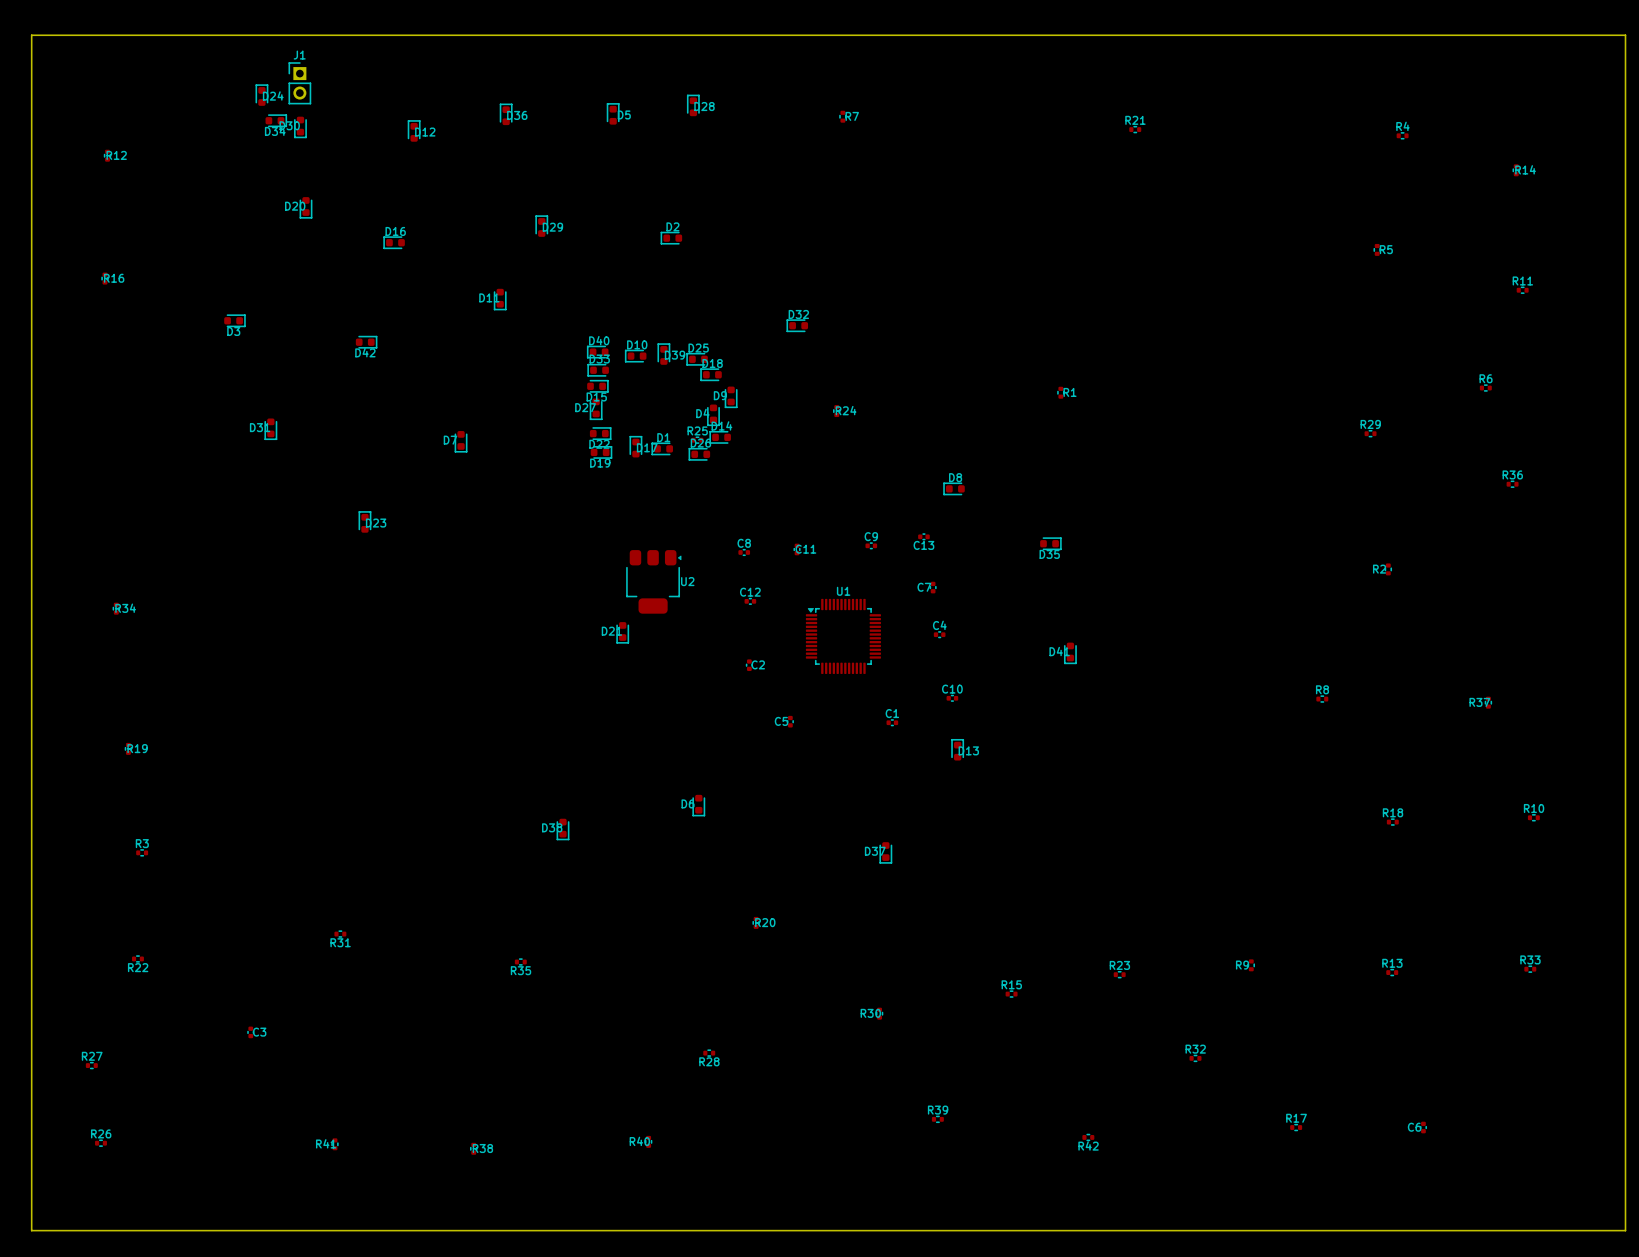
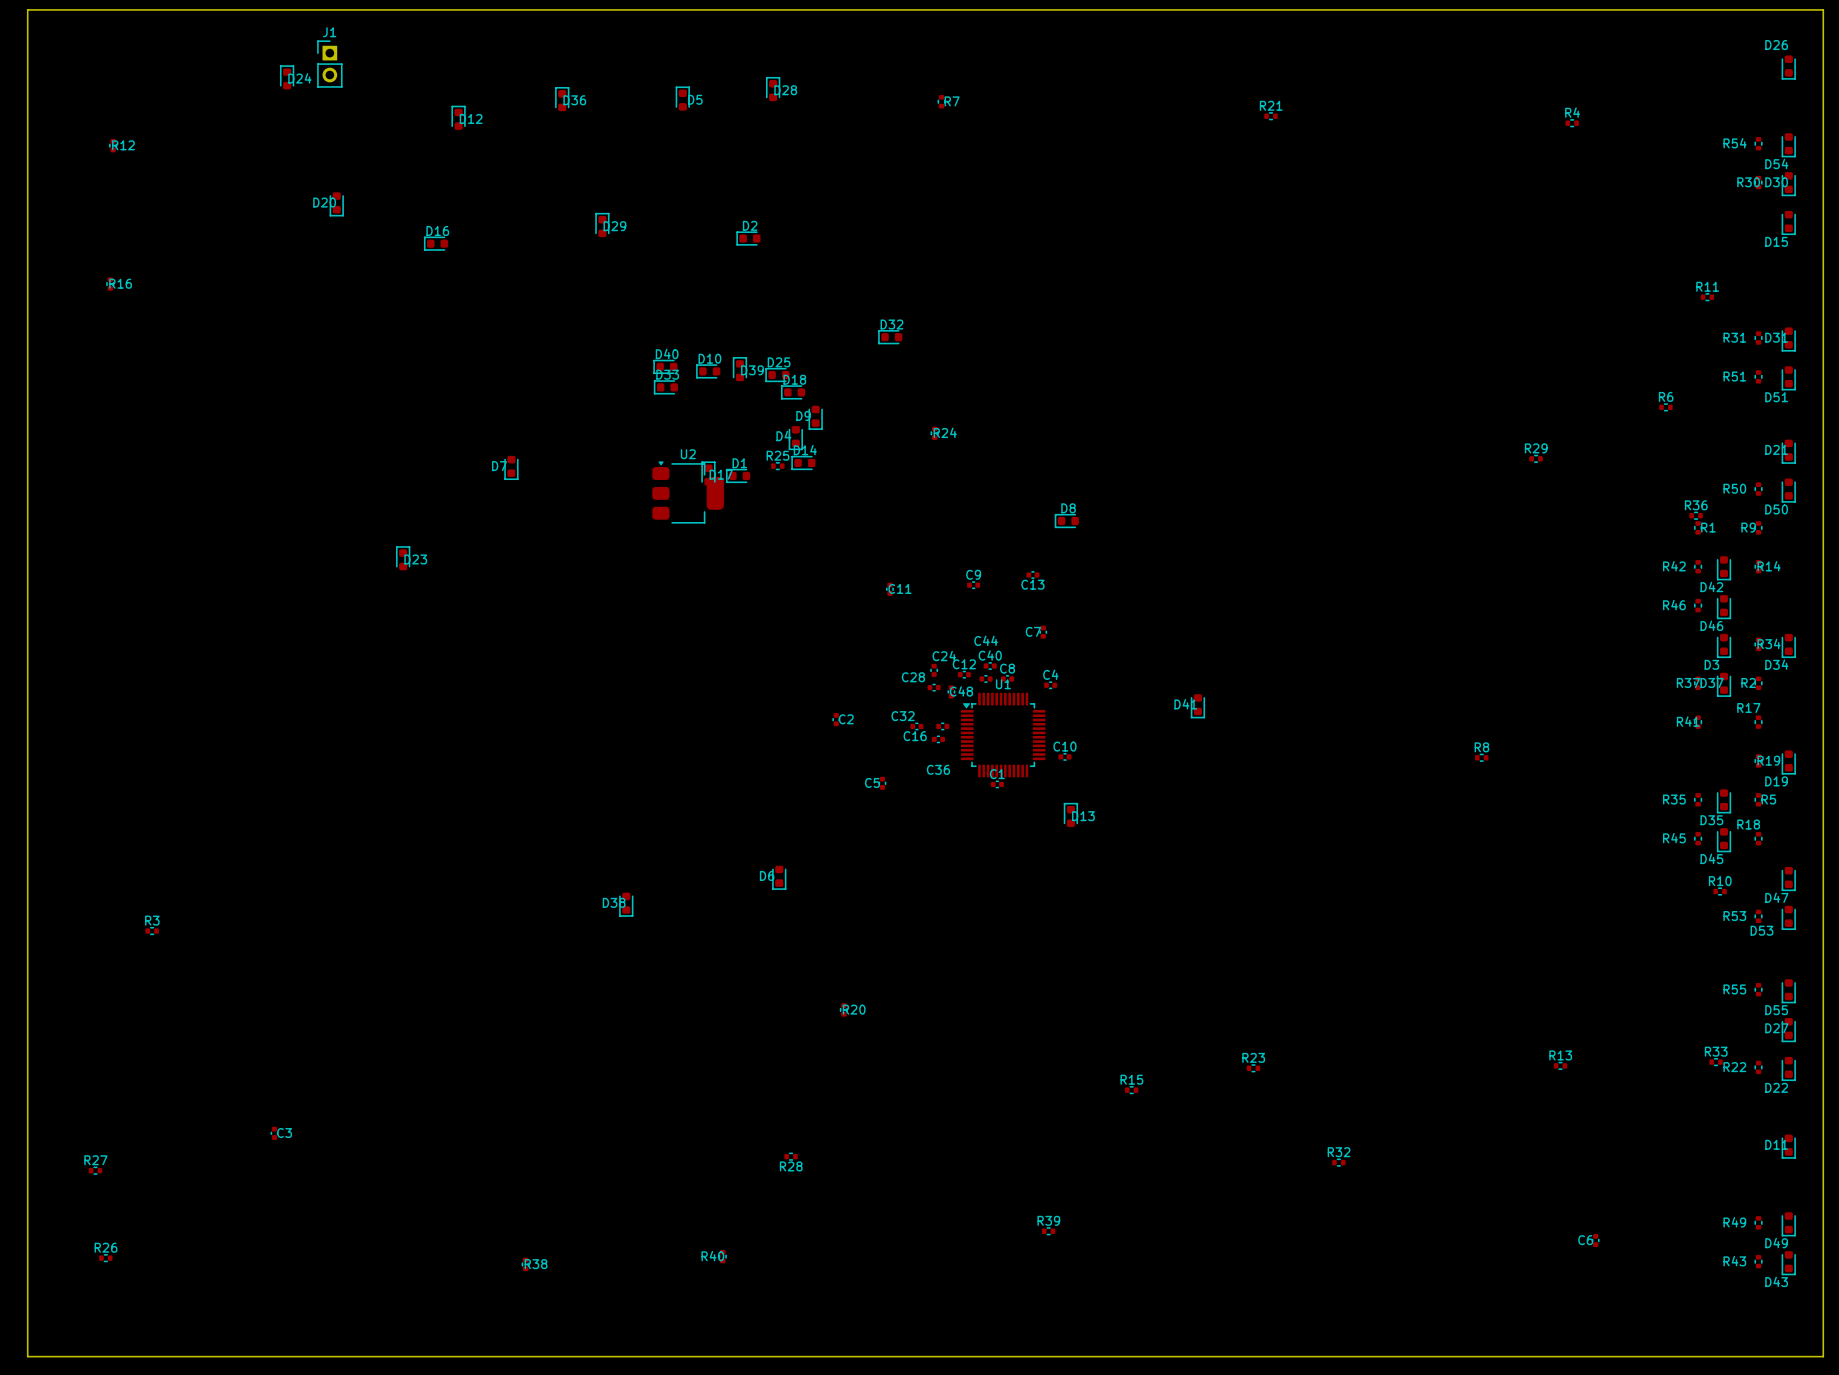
D34 rotation: 0° (276, 120) -> 90° clockwise (1788, 645)
D34 position: (276, 120) -> (1788, 645)
D30 position: (300, 127) -> (1788, 183)
R54: none -> (1758, 143)
D54: none -> (1788, 145)
R14 position: (1516, 170) -> (1758, 566)
R5 position: (1377, 249) -> (1758, 799)
D11 position: (500, 299) -> (1788, 1146)
D3 rotation: 0° (234, 320) -> 90° clockwise (1724, 645)
D3 position: (234, 320) -> (1724, 645)
D42 rotation: 0° (366, 342) -> 90° clockwise (1724, 568)
D42 position: (366, 342) -> (1724, 568)
R51: none -> (1758, 376)
D51: none -> (1788, 378)
D15 rotation: 0° (597, 386) -> 90° clockwise (1788, 222)
D15 position: (597, 386) -> (1788, 222)
R1 position: (1060, 392) -> (1698, 527)
D27 position: (596, 409) -> (1788, 1029)
D31 position: (270, 429) -> (1788, 339)
D22 rotation: 0° (600, 433) -> 90° clockwise (1788, 1068)
D22 position: (600, 433) -> (1788, 1068)
D19 rotation: 0° (601, 452) -> 90° clockwise (1788, 762)
D19 position: (601, 452) -> (1788, 762)
D26 rotation: 0° (699, 454) -> 90° counterclockwise (1788, 67)
D26 position: (699, 454) -> (1788, 67)
R50: none -> (1758, 489)
D50: none -> (1788, 490)
D35 rotation: 0° (1050, 543) -> 90° clockwise (1724, 801)
D35 position: (1050, 543) -> (1724, 801)
C8 position: (744, 552) -> (1007, 678)
R46: none -> (1698, 605)
D46: none -> (1724, 606)
R2 position: (1388, 569) -> (1758, 683)
U2 rotation: 0° (653, 581) -> 90° counterclockwise (688, 492)
U2 position: (653, 581) -> (688, 492)
C12 position: (750, 601) -> (964, 674)
R34 position: (116, 608) -> (1758, 644)
C40: none -> (990, 666)
C24: none -> (934, 670)
C44: none -> (985, 678)
D21 position: (622, 632) -> (1788, 451)
C28: none -> (934, 687)
U1 position: (843, 636) -> (1003, 735)
C48: none -> (951, 691)
C32: none -> (916, 726)
C16: none -> (942, 726)
C36: none -> (938, 739)
R37 position: (1488, 702) -> (1698, 683)
R19 position: (128, 748) -> (1758, 760)
R45: none -> (1698, 838)
D45: none -> (1724, 840)
D47: none -> (1788, 878)
R18 rotation: 0° (1392, 822) -> 90° clockwise (1758, 838)
R18 position: (1392, 822) -> (1758, 838)
R53: none -> (1758, 916)
D53: none -> (1788, 917)
D37 position: (885, 852) -> (1724, 684)
R55: none -> (1758, 989)
D55: none -> (1788, 991)
R31 rotation: 0° (340, 934) -> 90° clockwise (1758, 337)
R31 position: (340, 934) -> (1758, 337)
R22 rotation: 0° (137, 958) -> 90° clockwise (1758, 1067)
R22 position: (137, 958) -> (1758, 1067)
R35 rotation: 0° (520, 961) -> 90° clockwise (1698, 799)
R35 position: (520, 961) -> (1698, 799)
R9 position: (1251, 965) -> (1758, 527)
R30 position: (879, 1013) -> (1758, 182)
R49: none -> (1758, 1222)
D49: none -> (1788, 1224)
R17 rotation: 0° (1296, 1127) -> 90° clockwise (1758, 722)
R17 position: (1296, 1127) -> (1758, 722)
R42 rotation: 0° (1088, 1137) -> 90° clockwise (1698, 566)
R42 position: (1088, 1137) -> (1698, 566)
R41 position: (334, 1144) -> (1698, 722)
R43: none -> (1758, 1261)
D43: none -> (1788, 1263)

